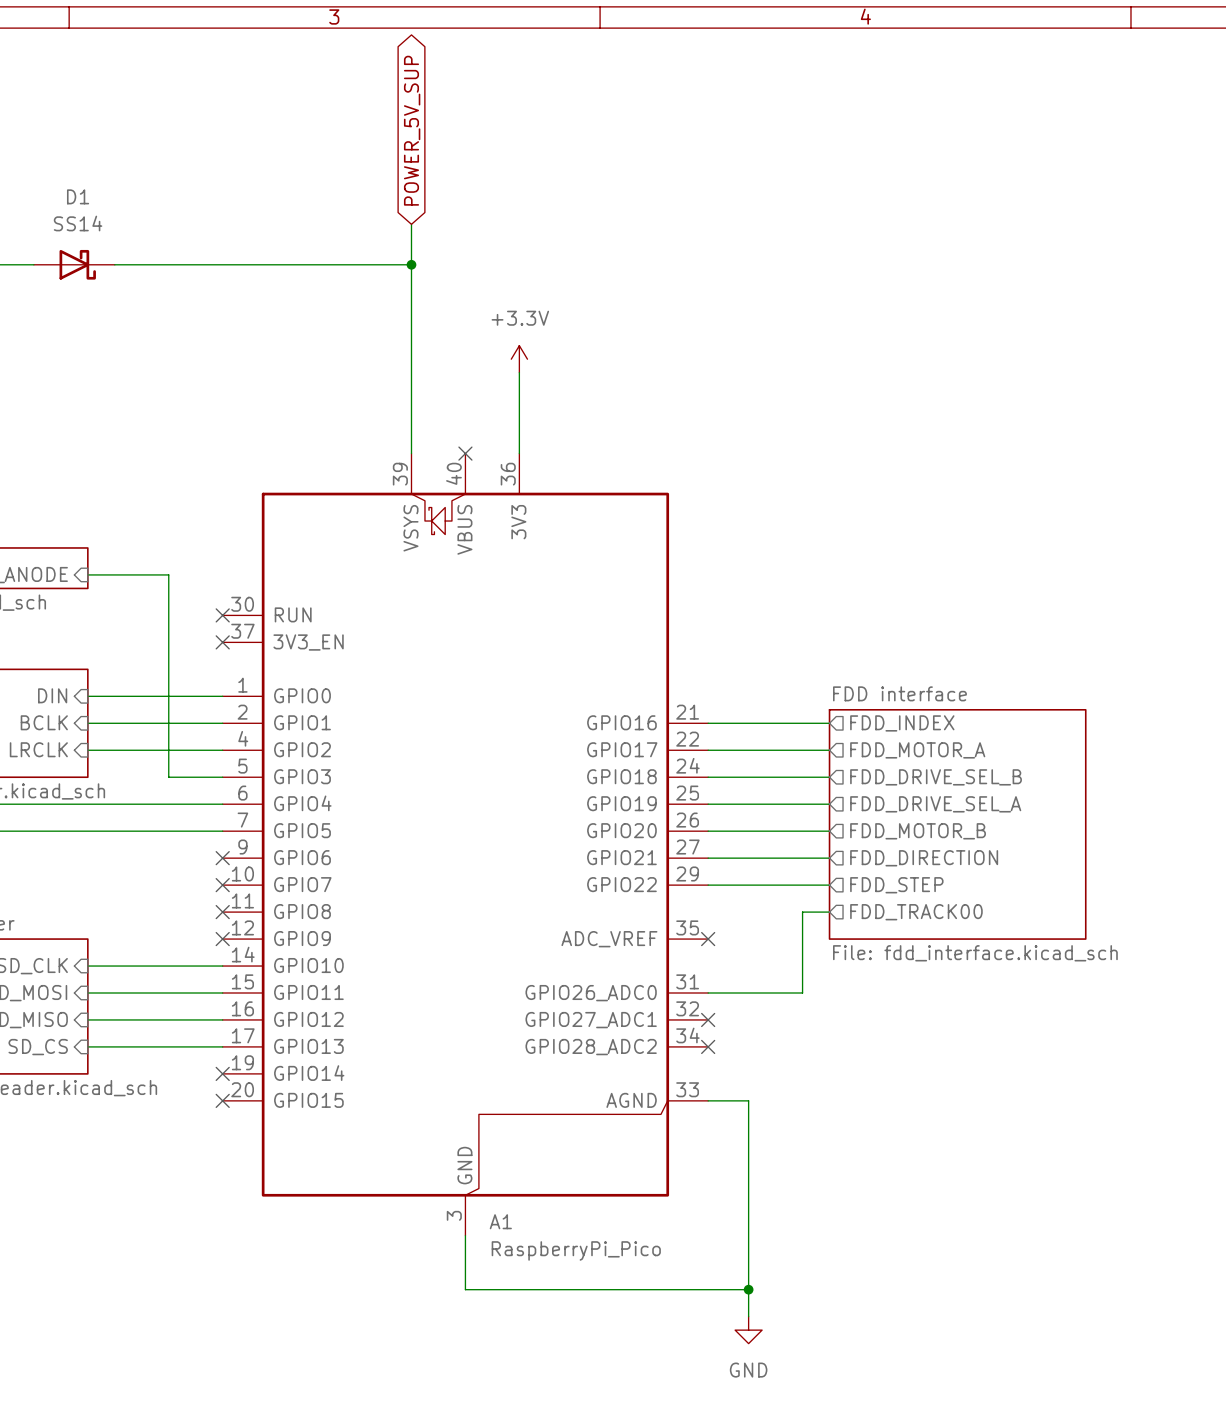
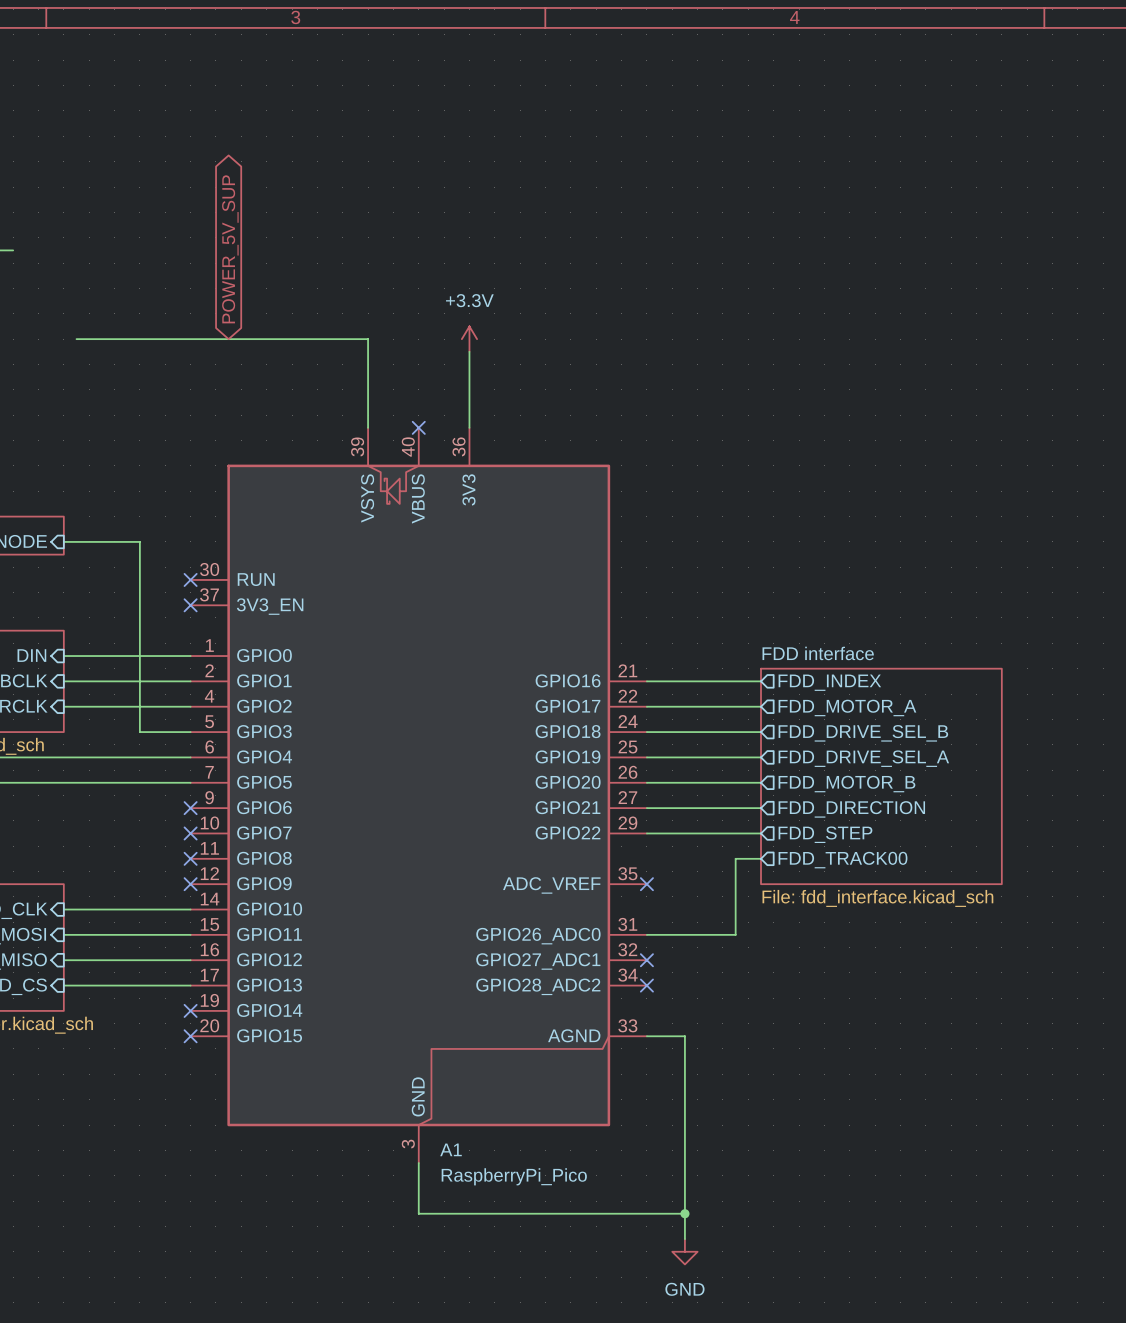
global label position: POWER_5V_SUP (412, 130) -> POWER_5V_SUP (230, 249)
wire: (411, 224) (411, 359) -> (76, 339) (368, 339)
D1: SS14 (74, 264) -> none
wire: (114, 264) (411, 264) -> none
junction: (411, 264) -> none

